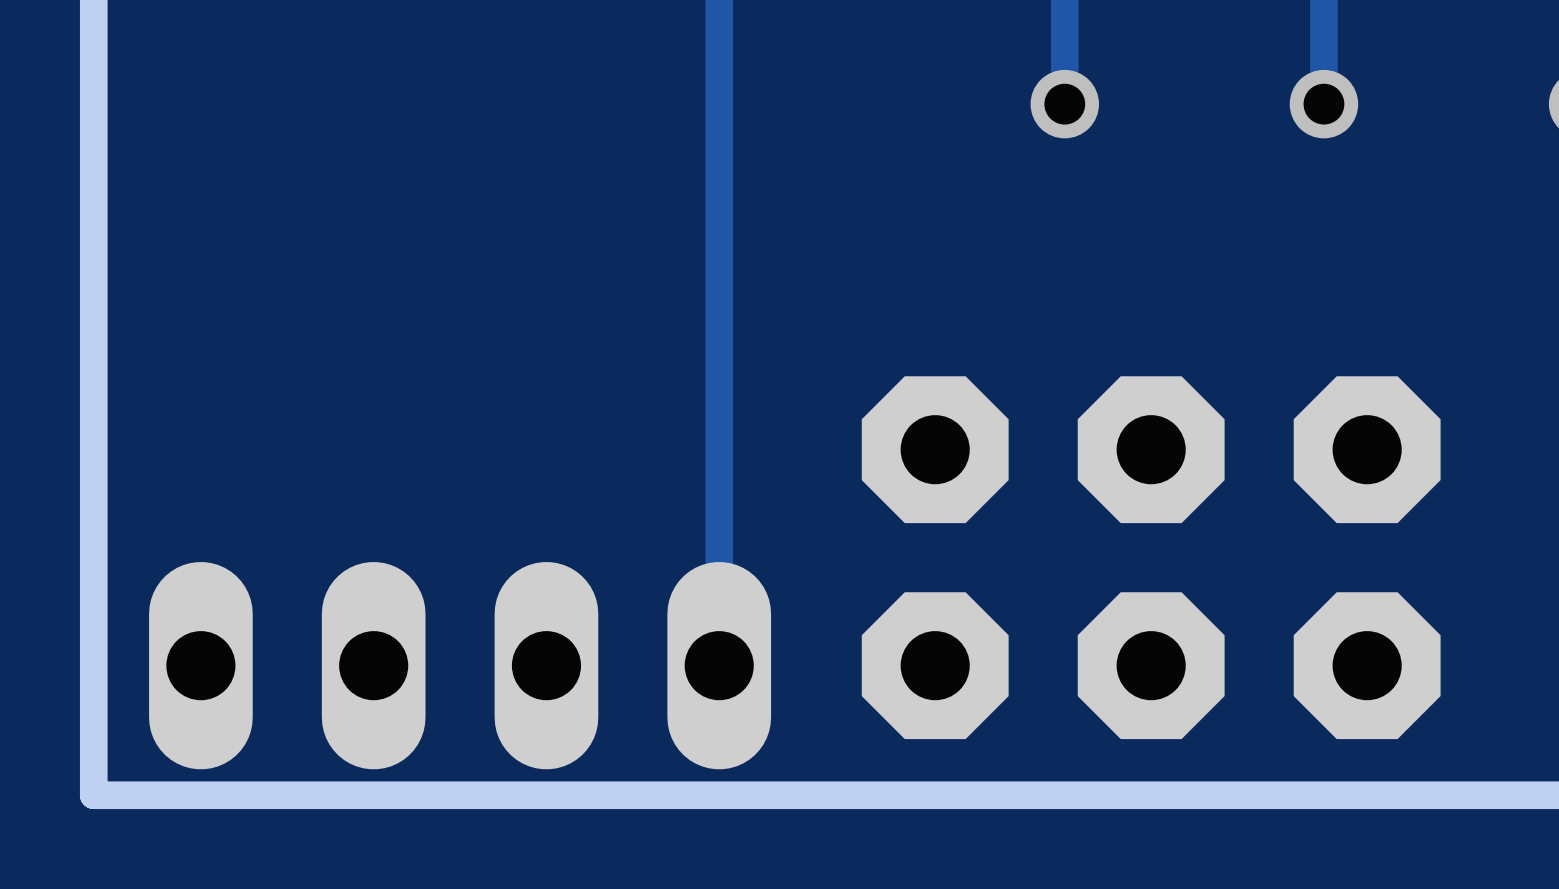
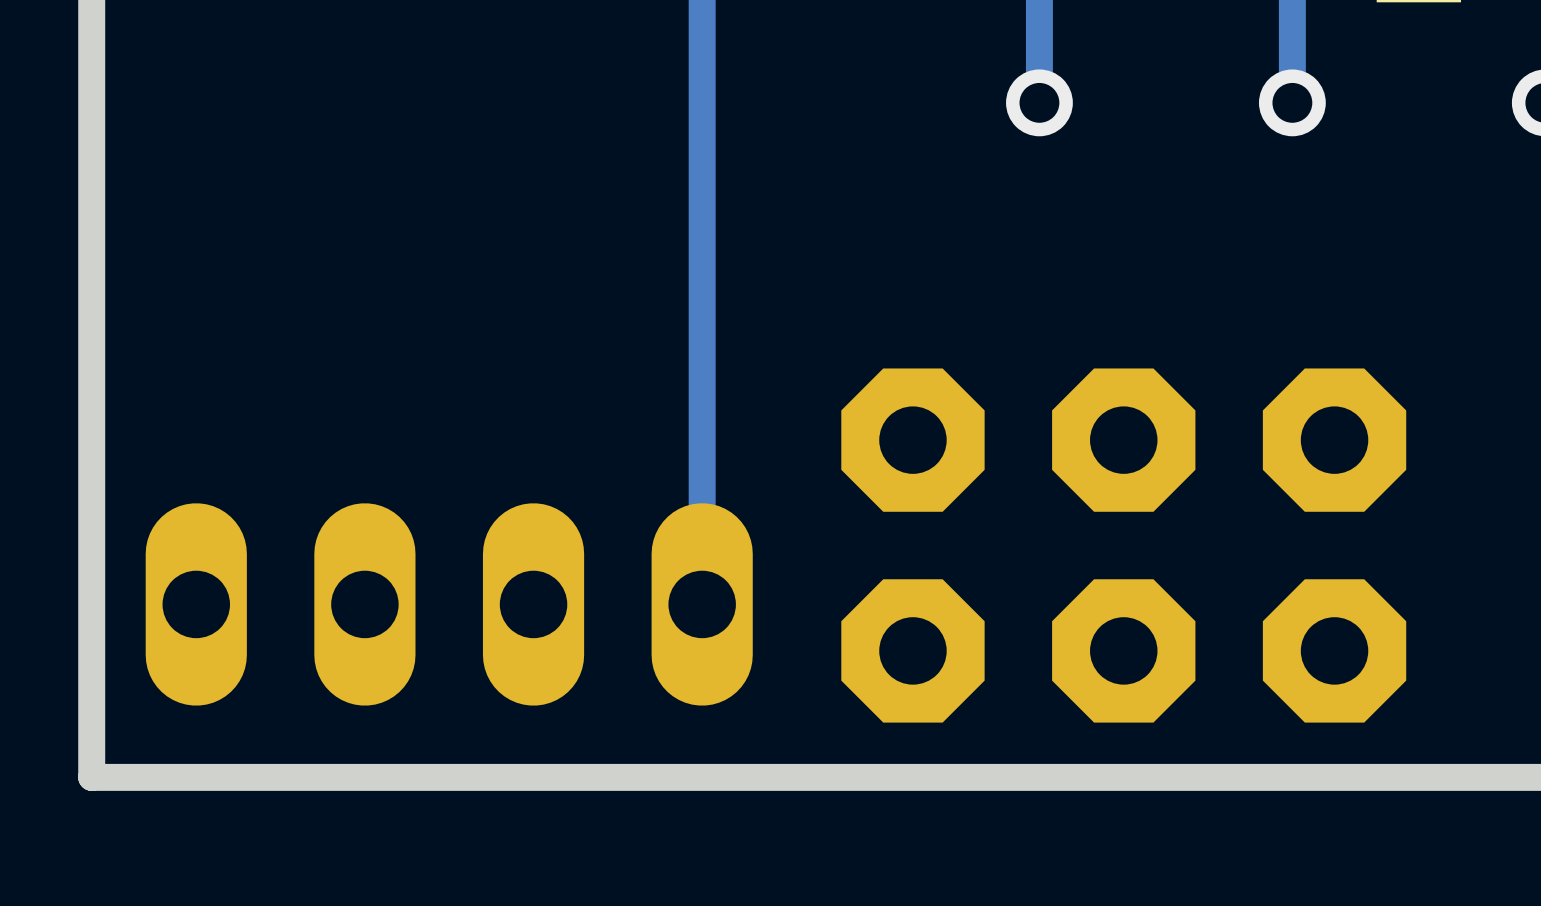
part position: (460, 665) -> (449, 604)

